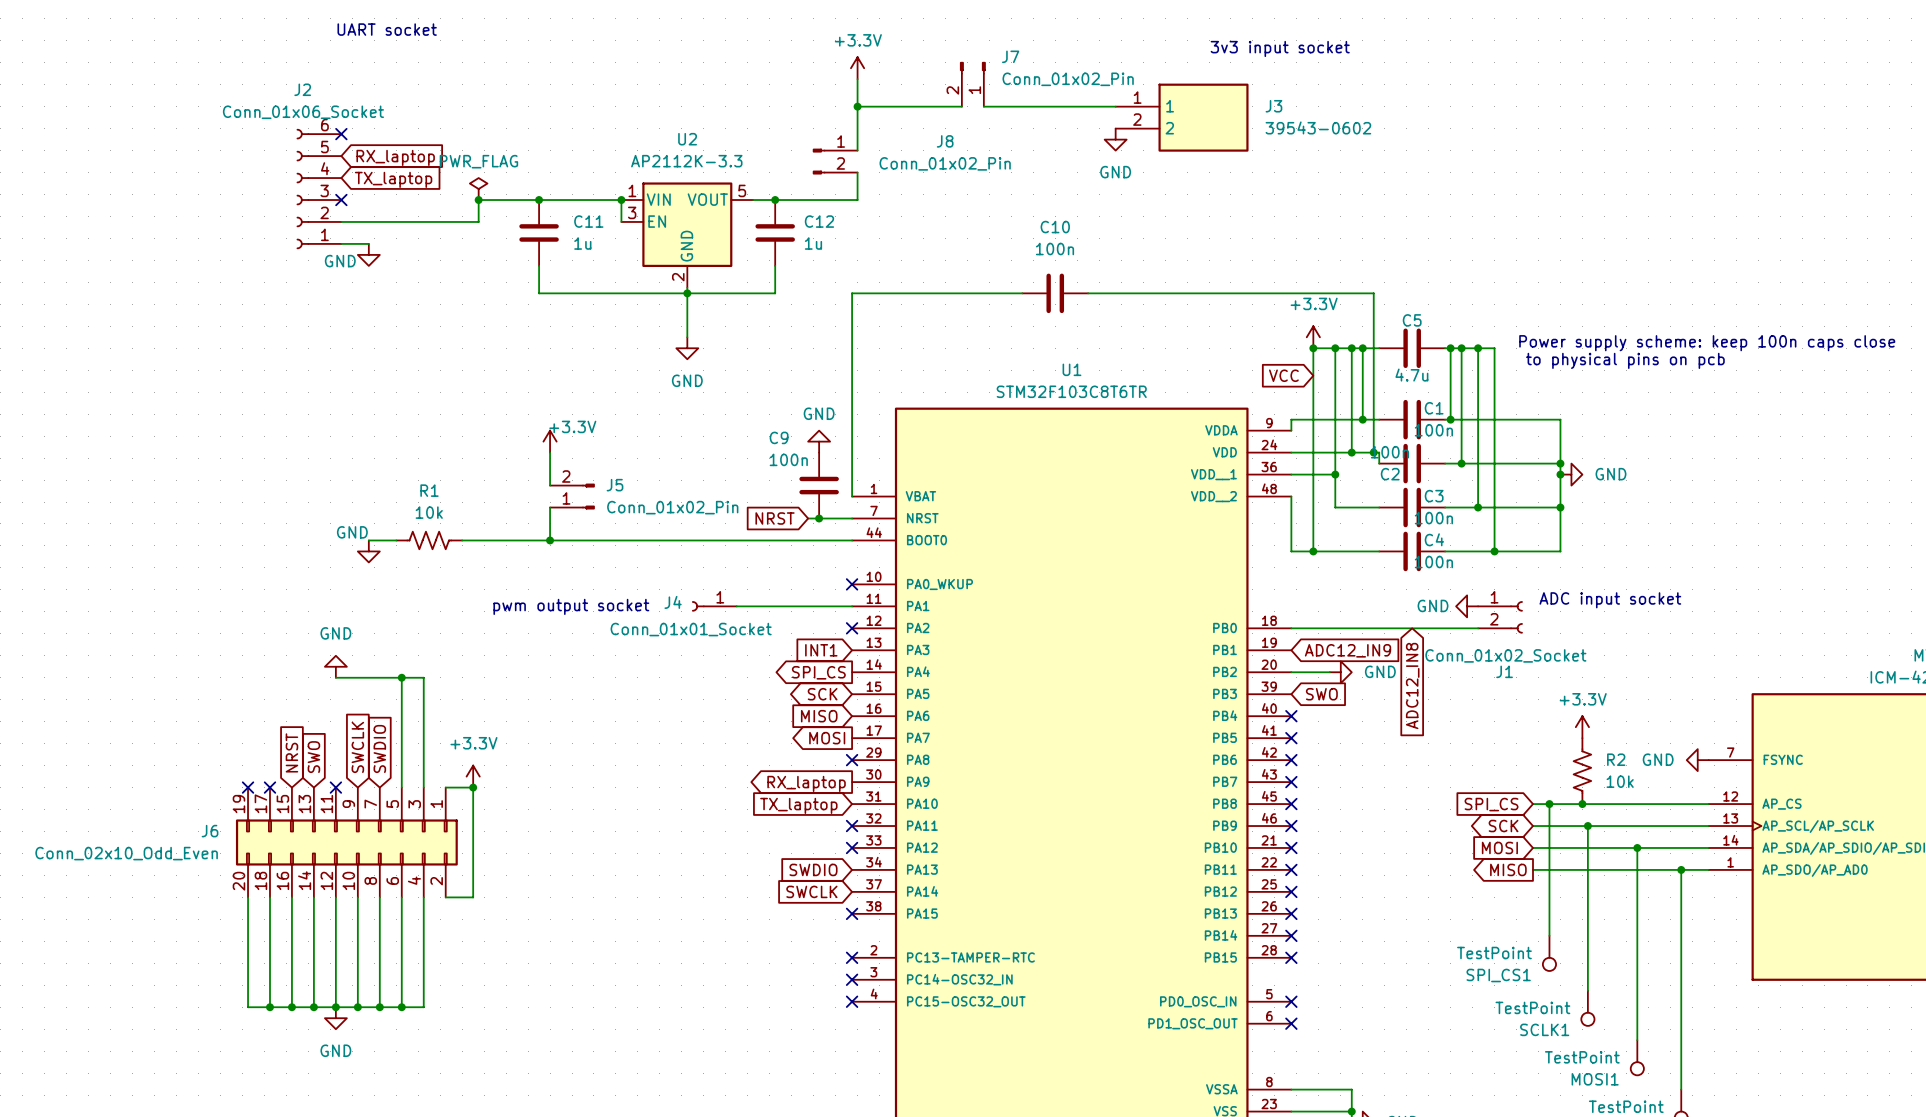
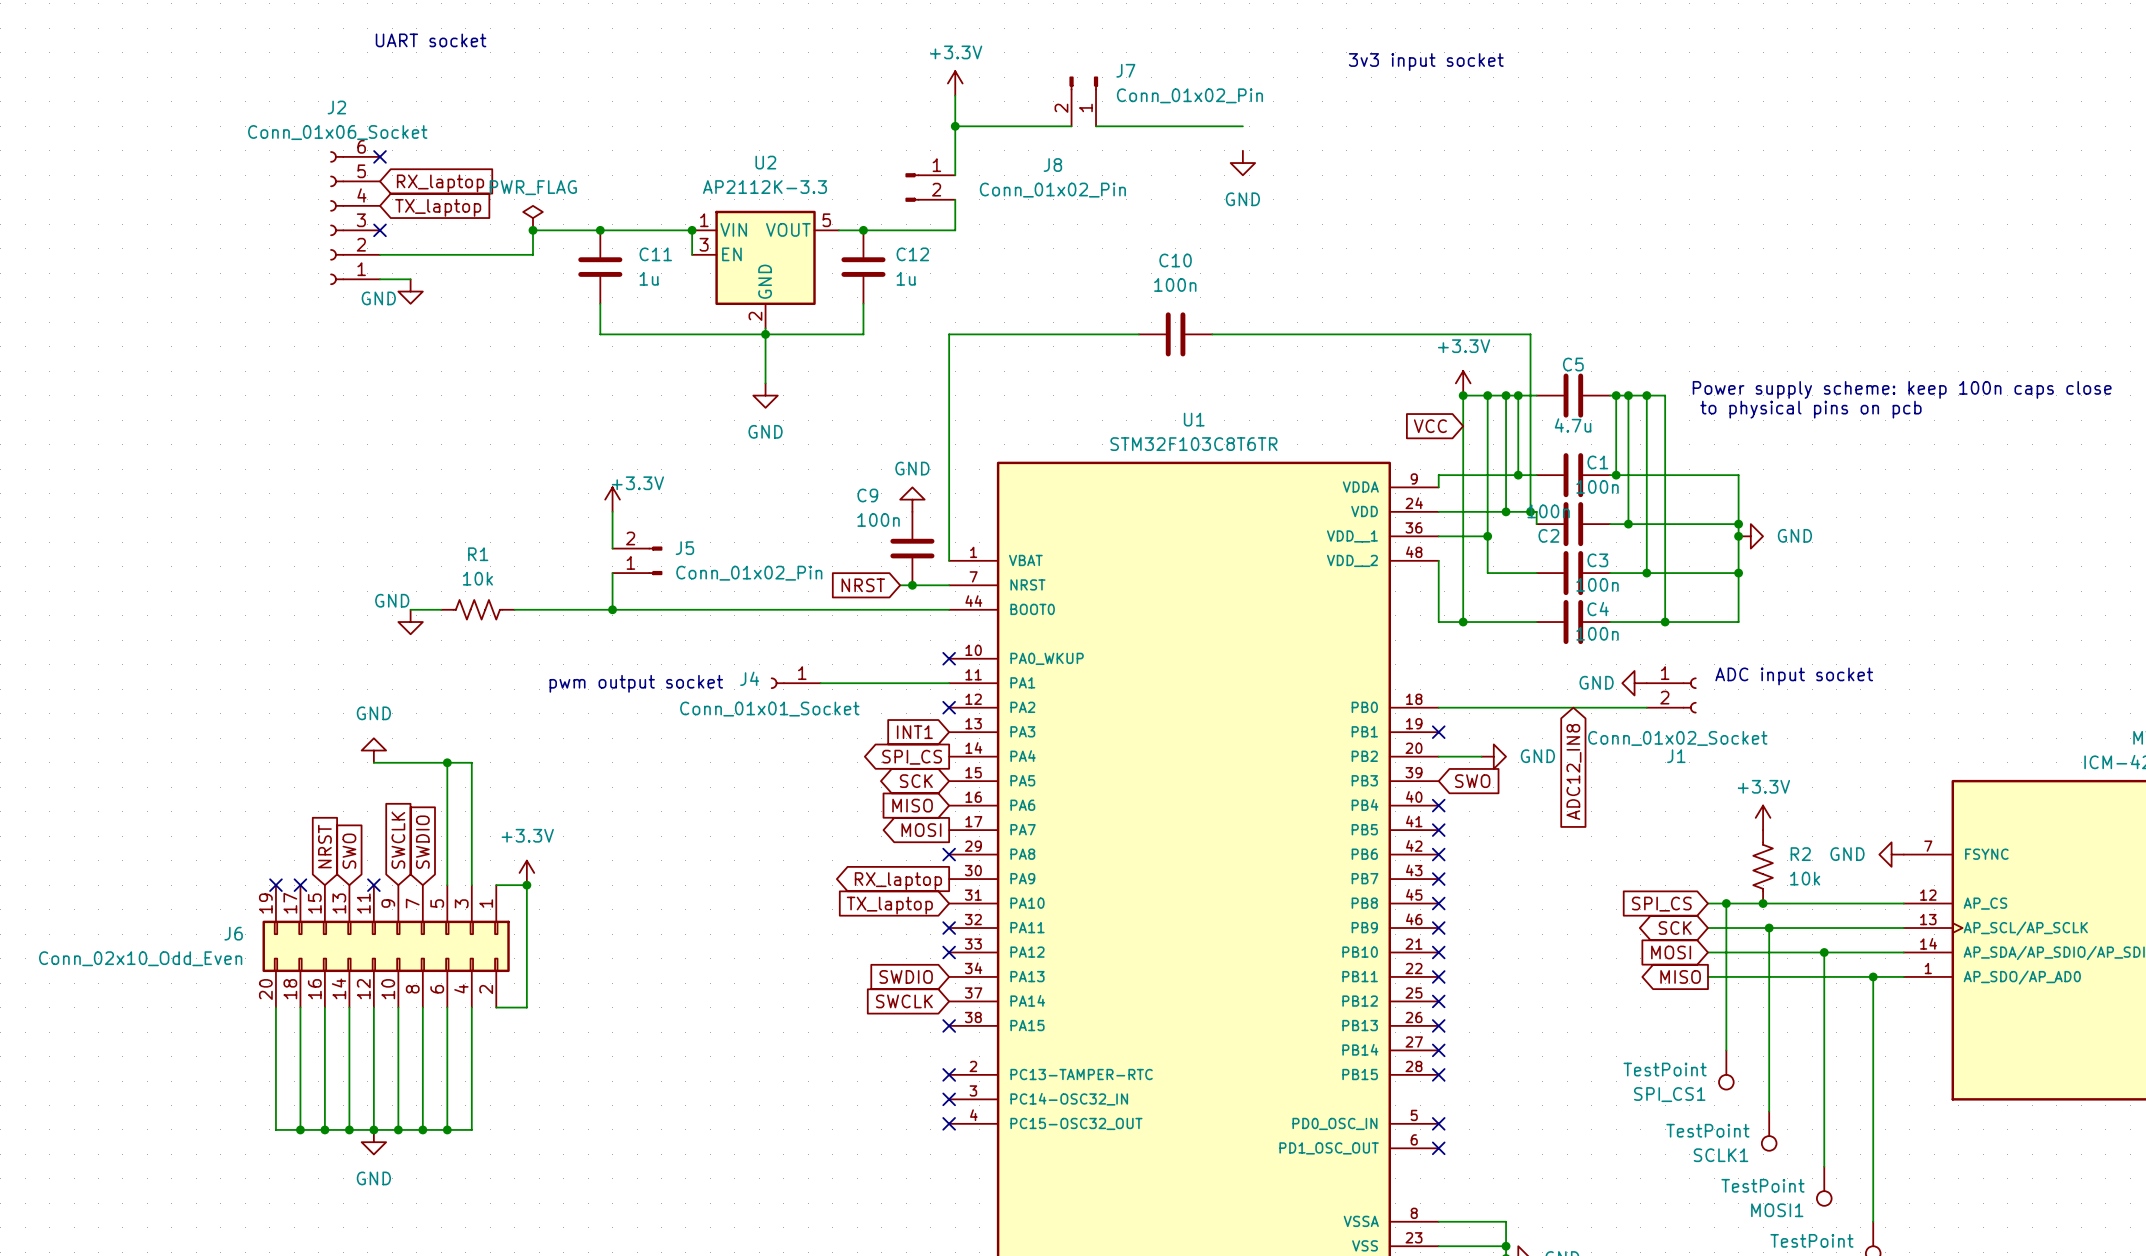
J3: 39543-0602 (1182, 117) -> none
no-connect mark: none -> (1438, 732)
global label: ADC12_IN9 (1348, 650) -> none

